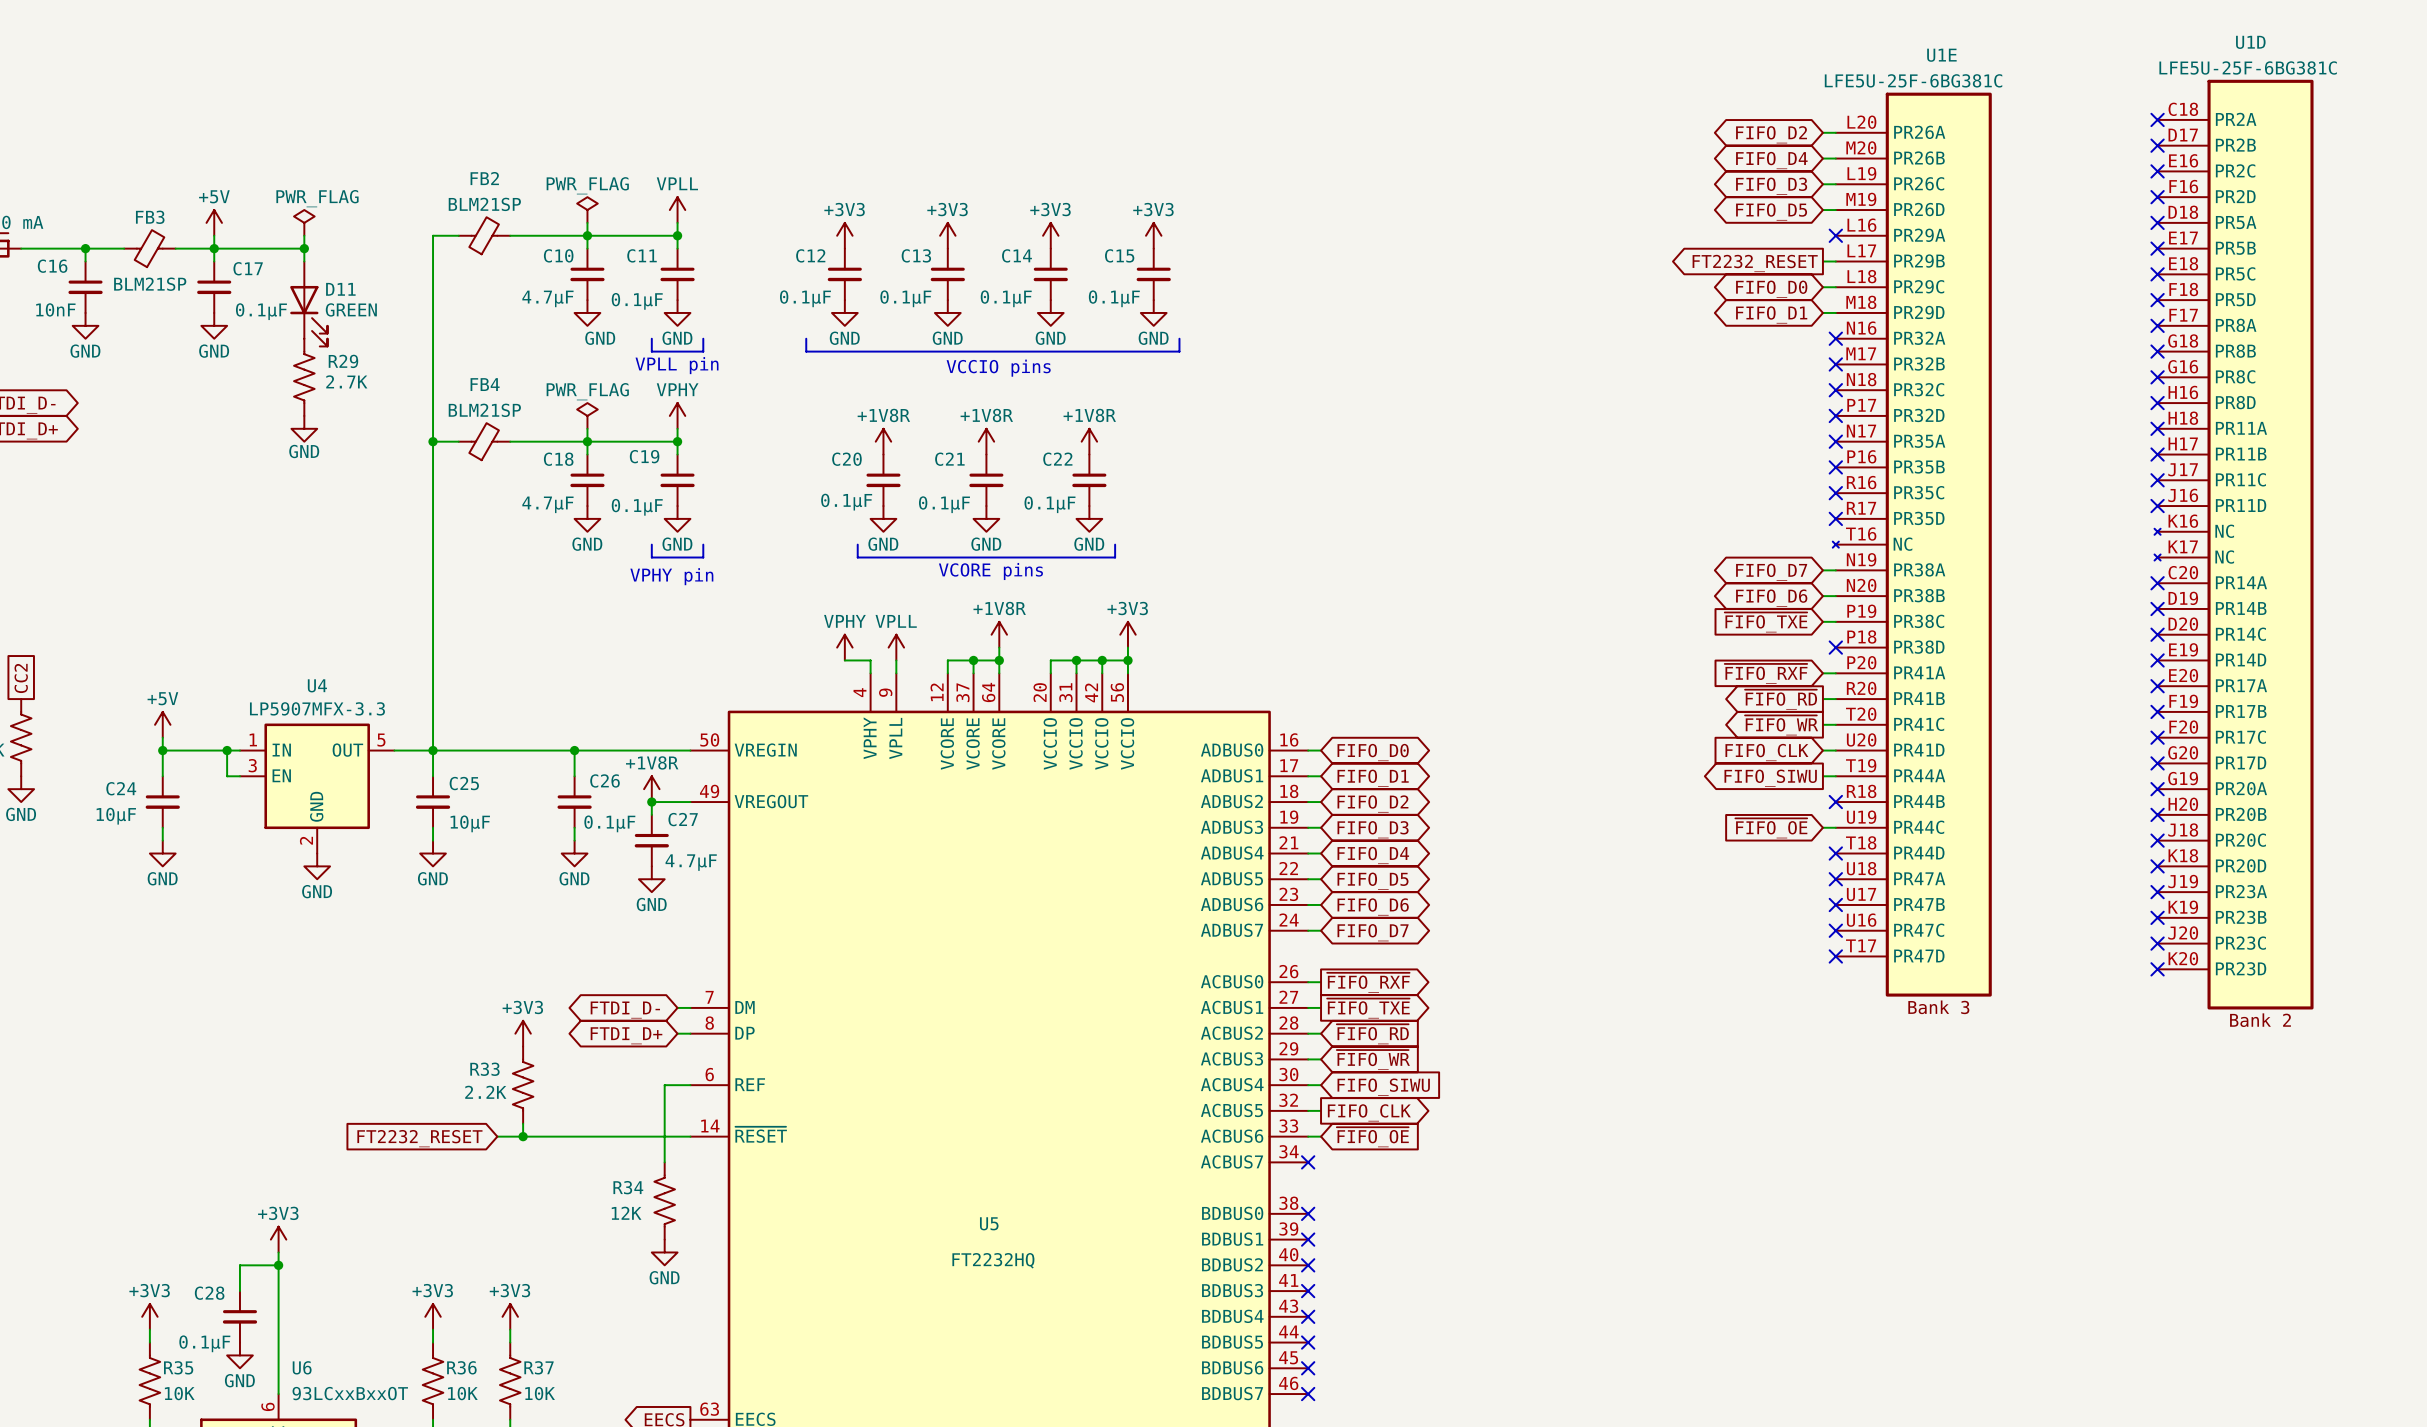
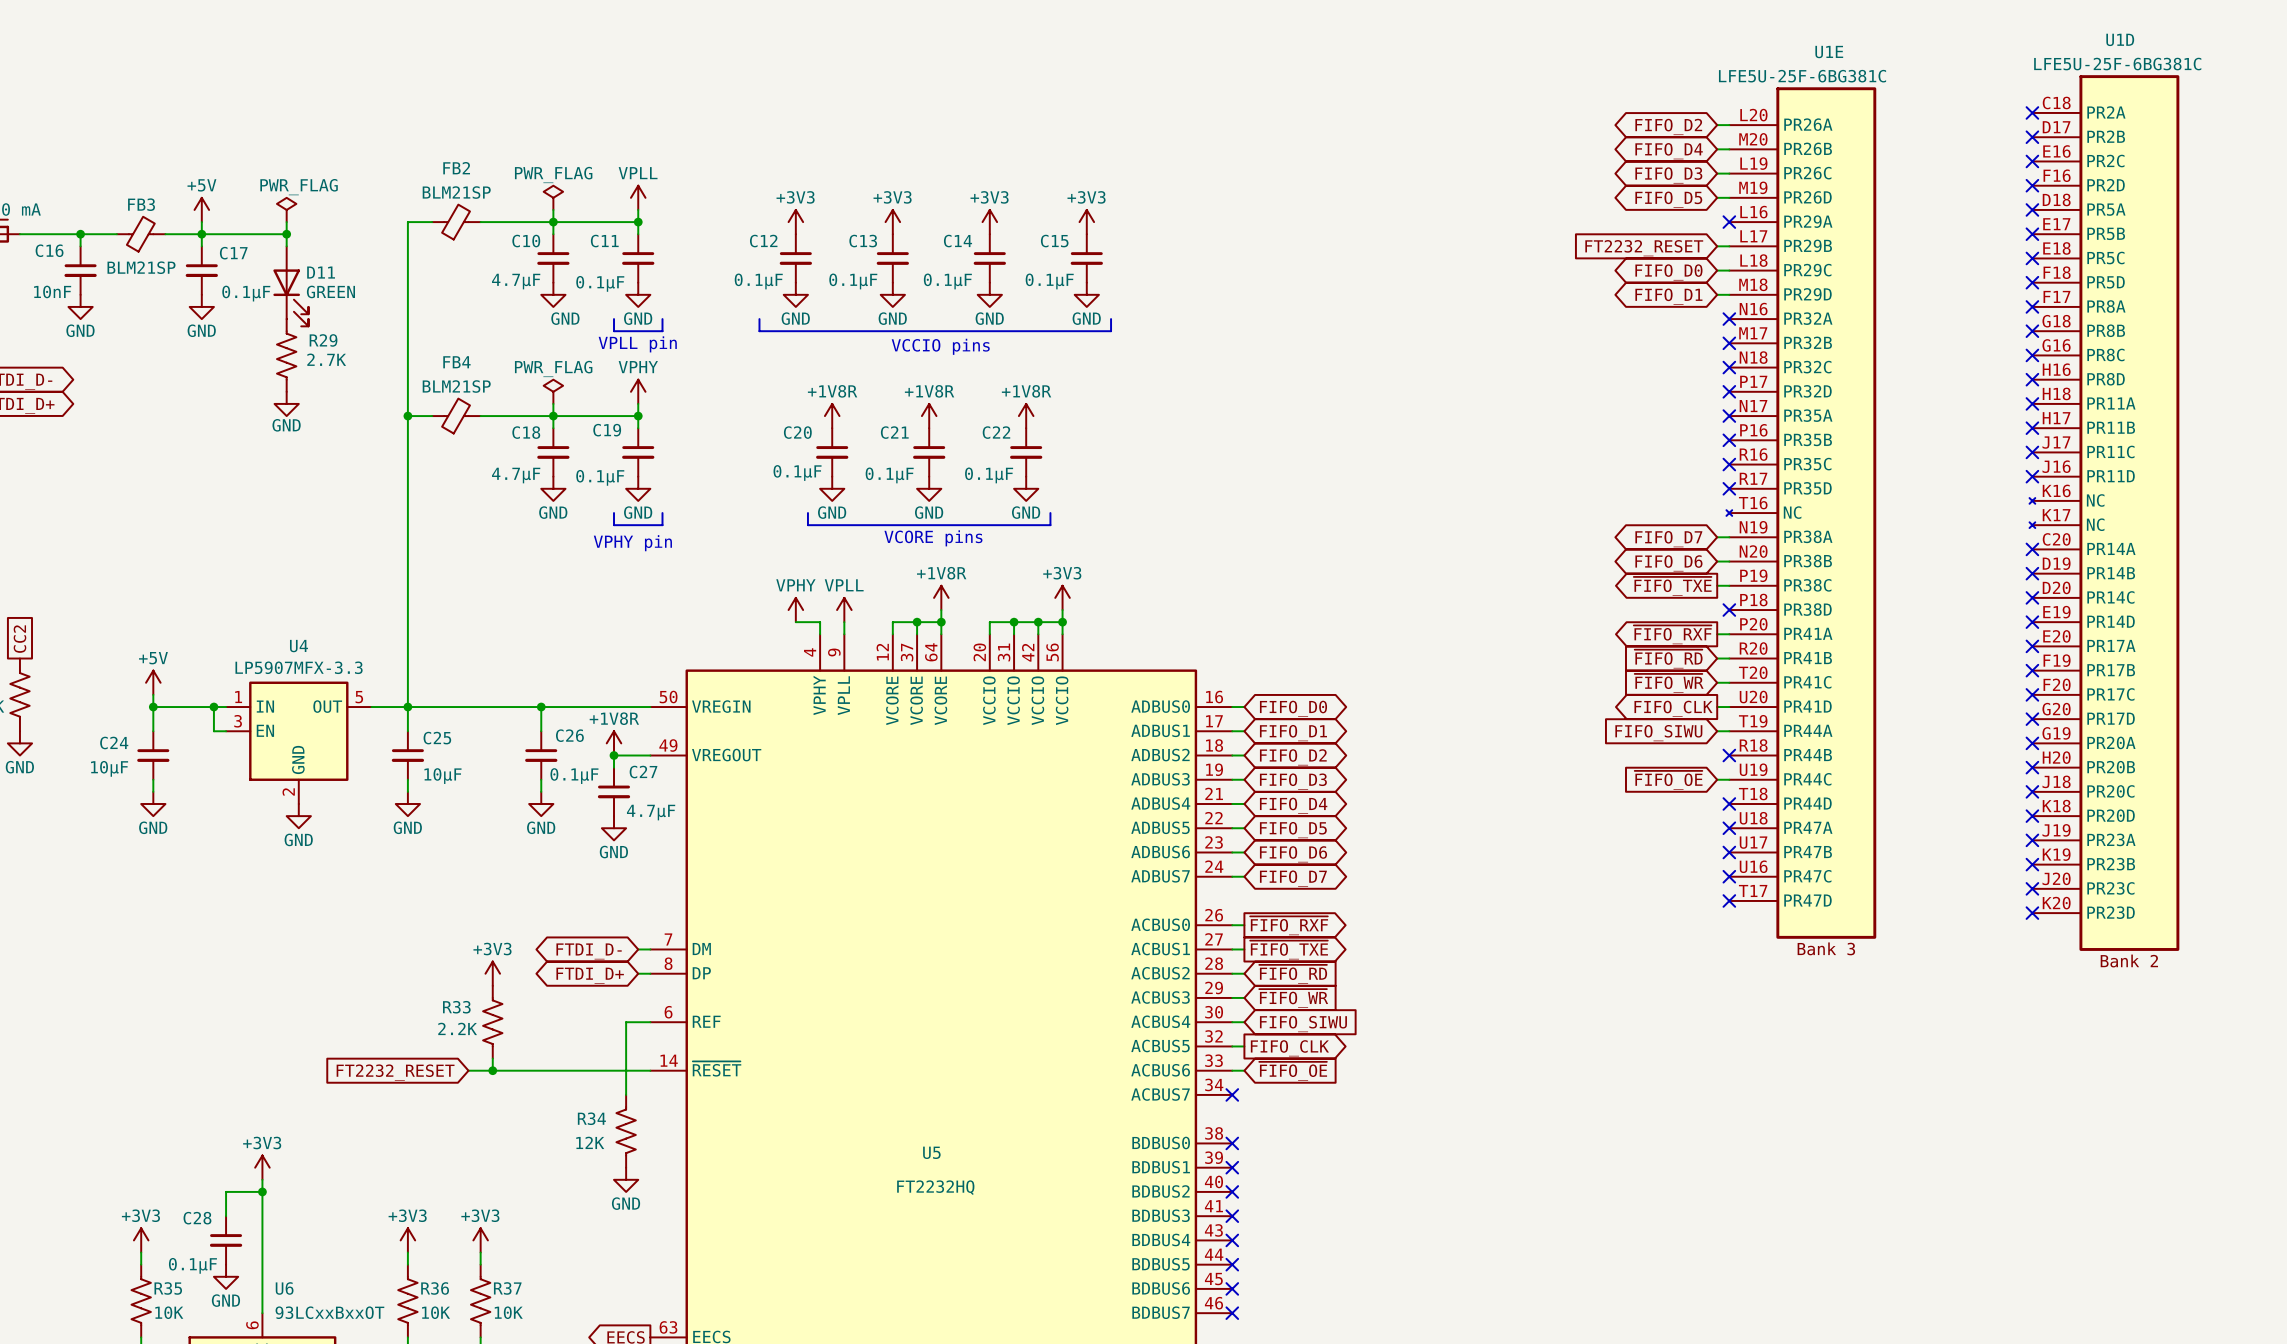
global label shape: output (1755, 263) -> input (1644, 248)
global label shape: input (1766, 622) -> output (1672, 586)
global label shape: input (1766, 673) -> output (1672, 634)
global label shape: output (1781, 699) -> input (1668, 659)
global label shape: output (1781, 725) -> input (1669, 683)
global label shape: input (1766, 752) -> output (1673, 708)
global label shape: output (1770, 778) -> input (1658, 733)

